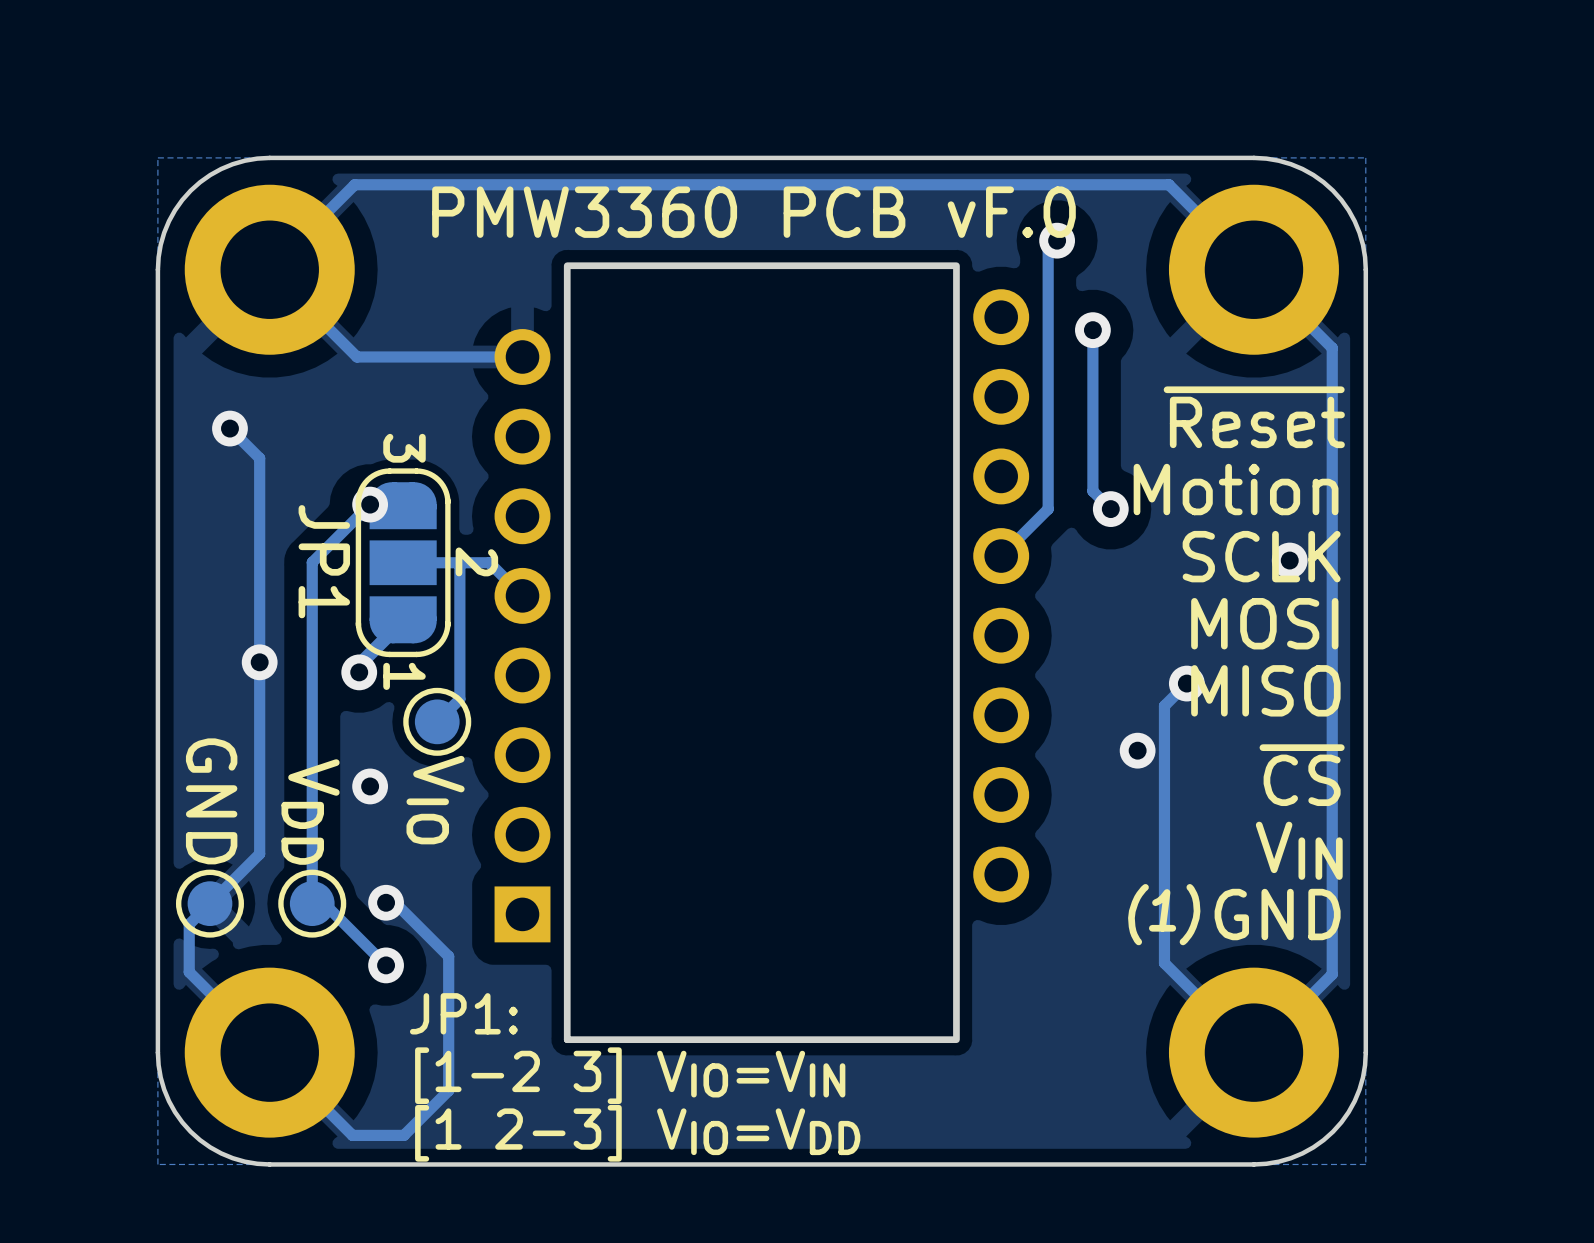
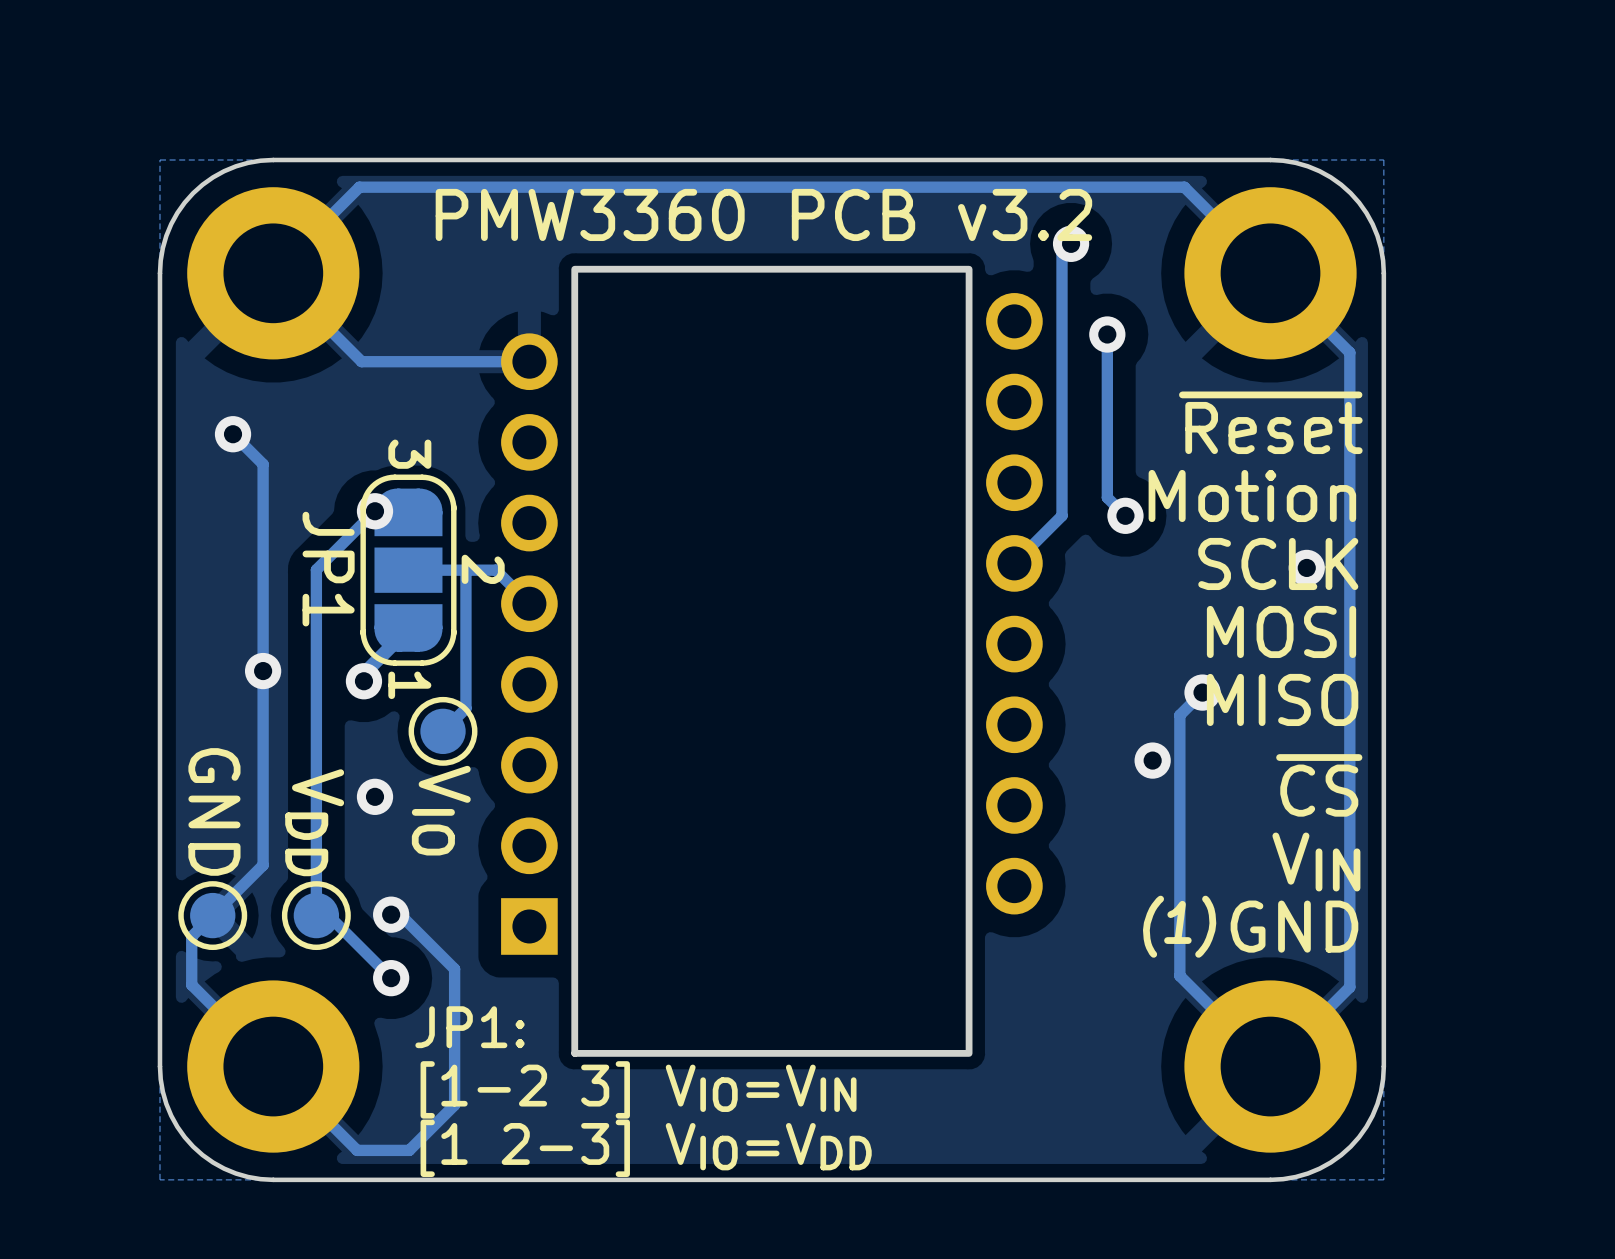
text: PMW3360 PCB vF.0 (753, 212) -> PMW3360 PCB v3.2 (763, 214)

